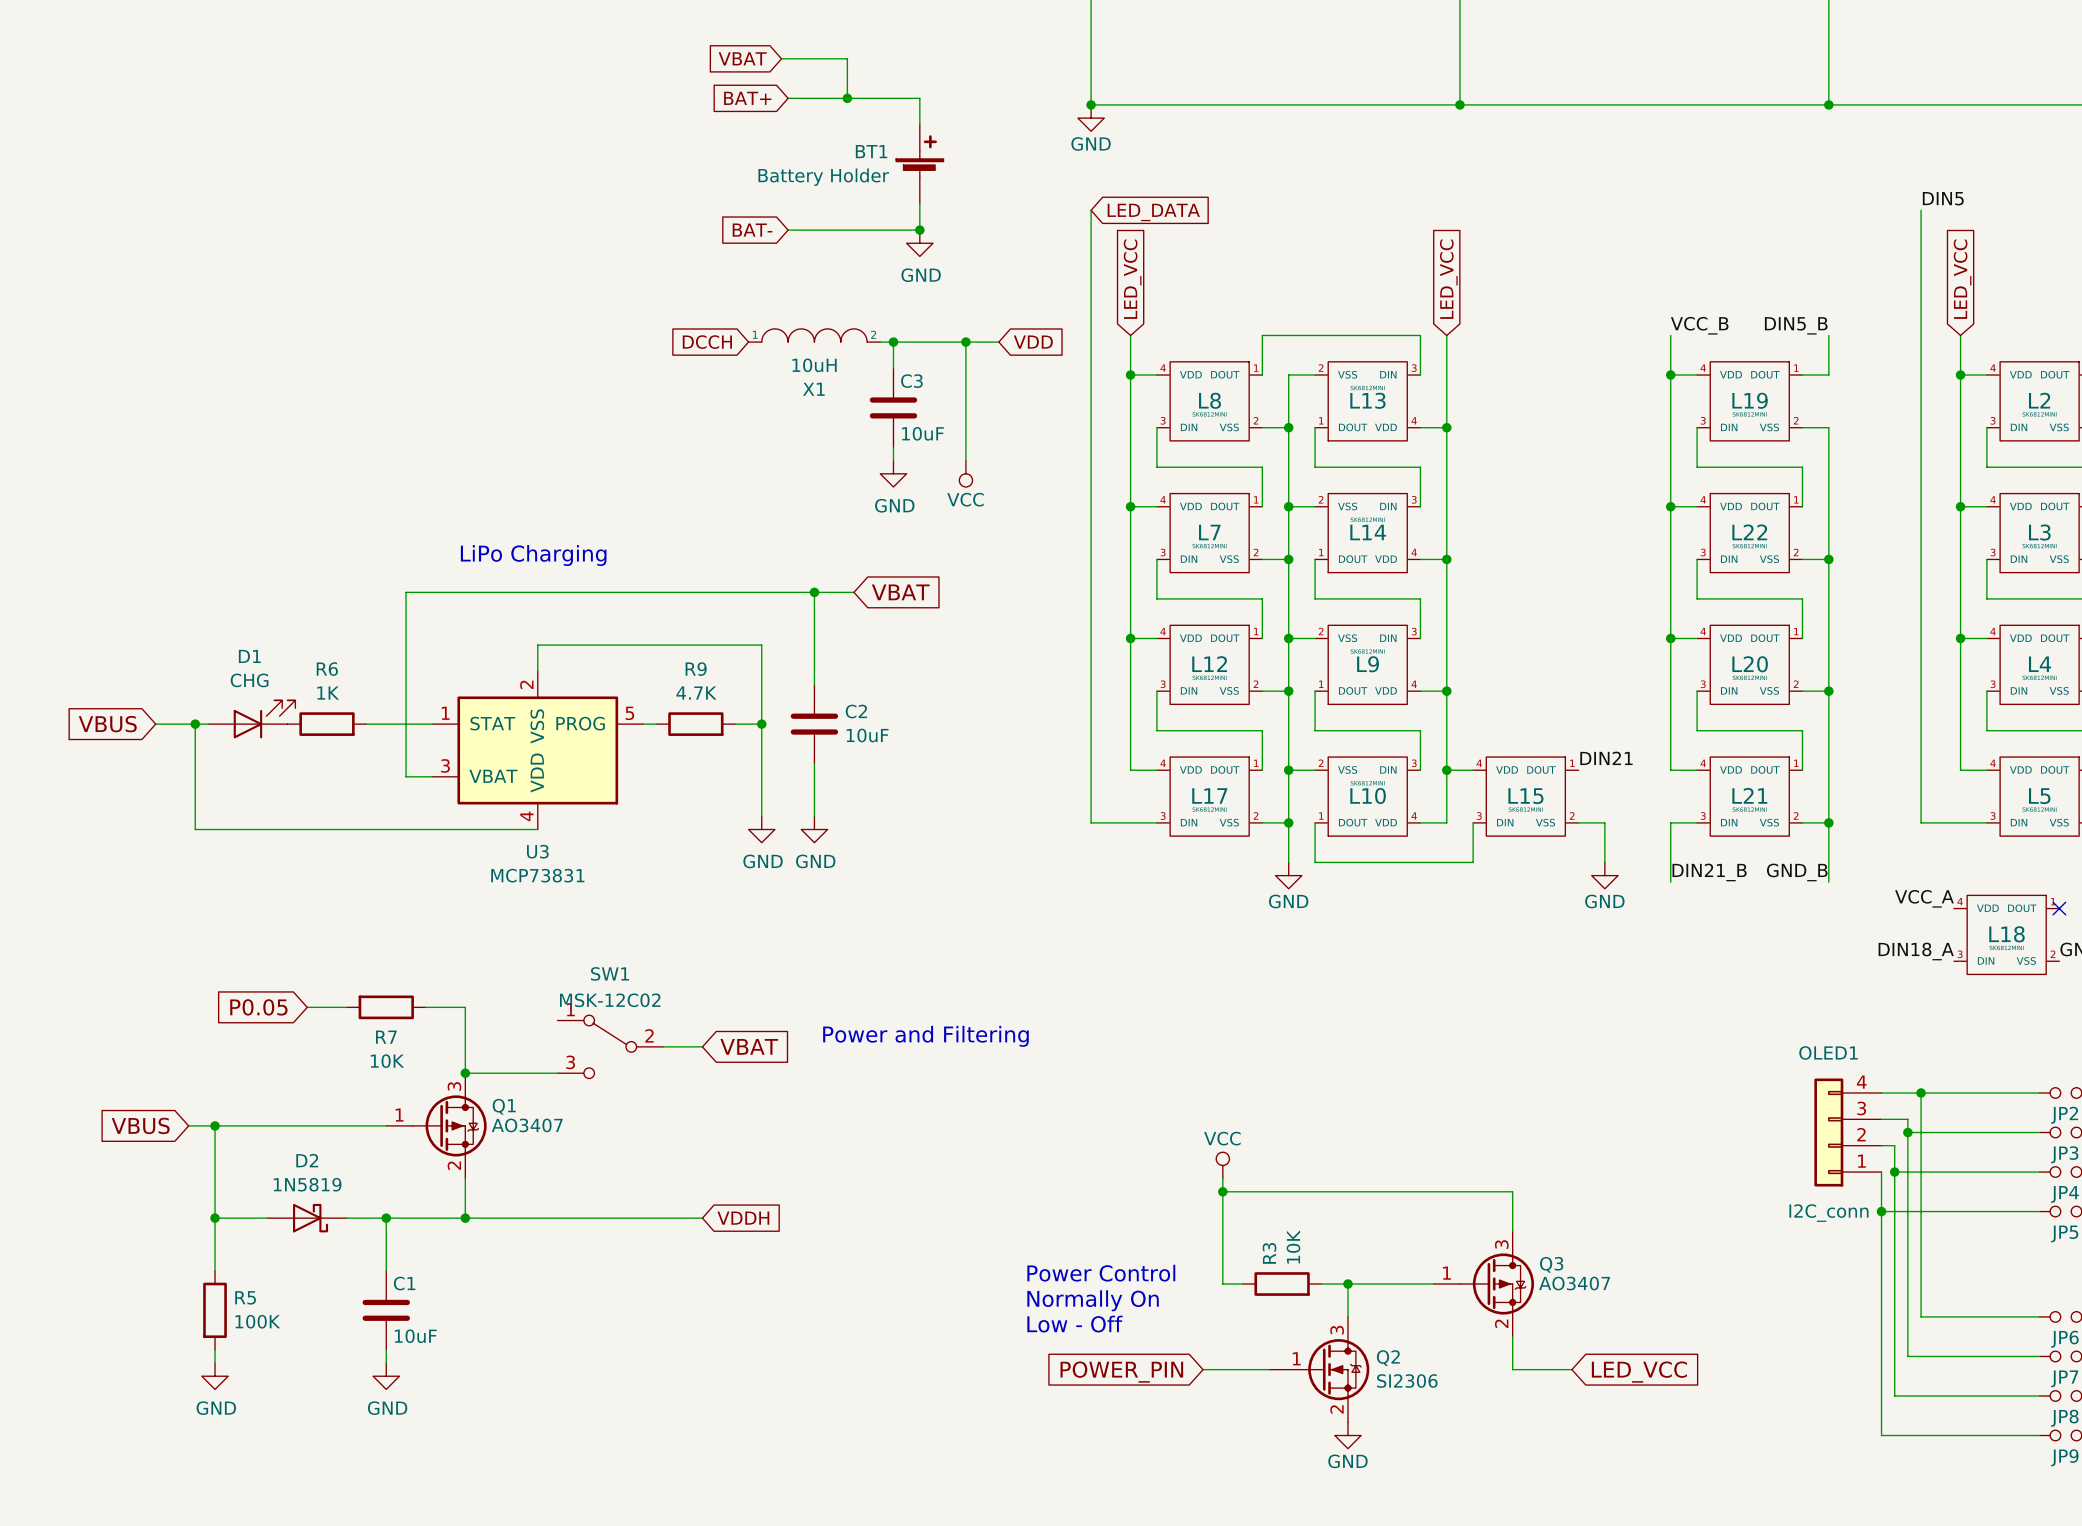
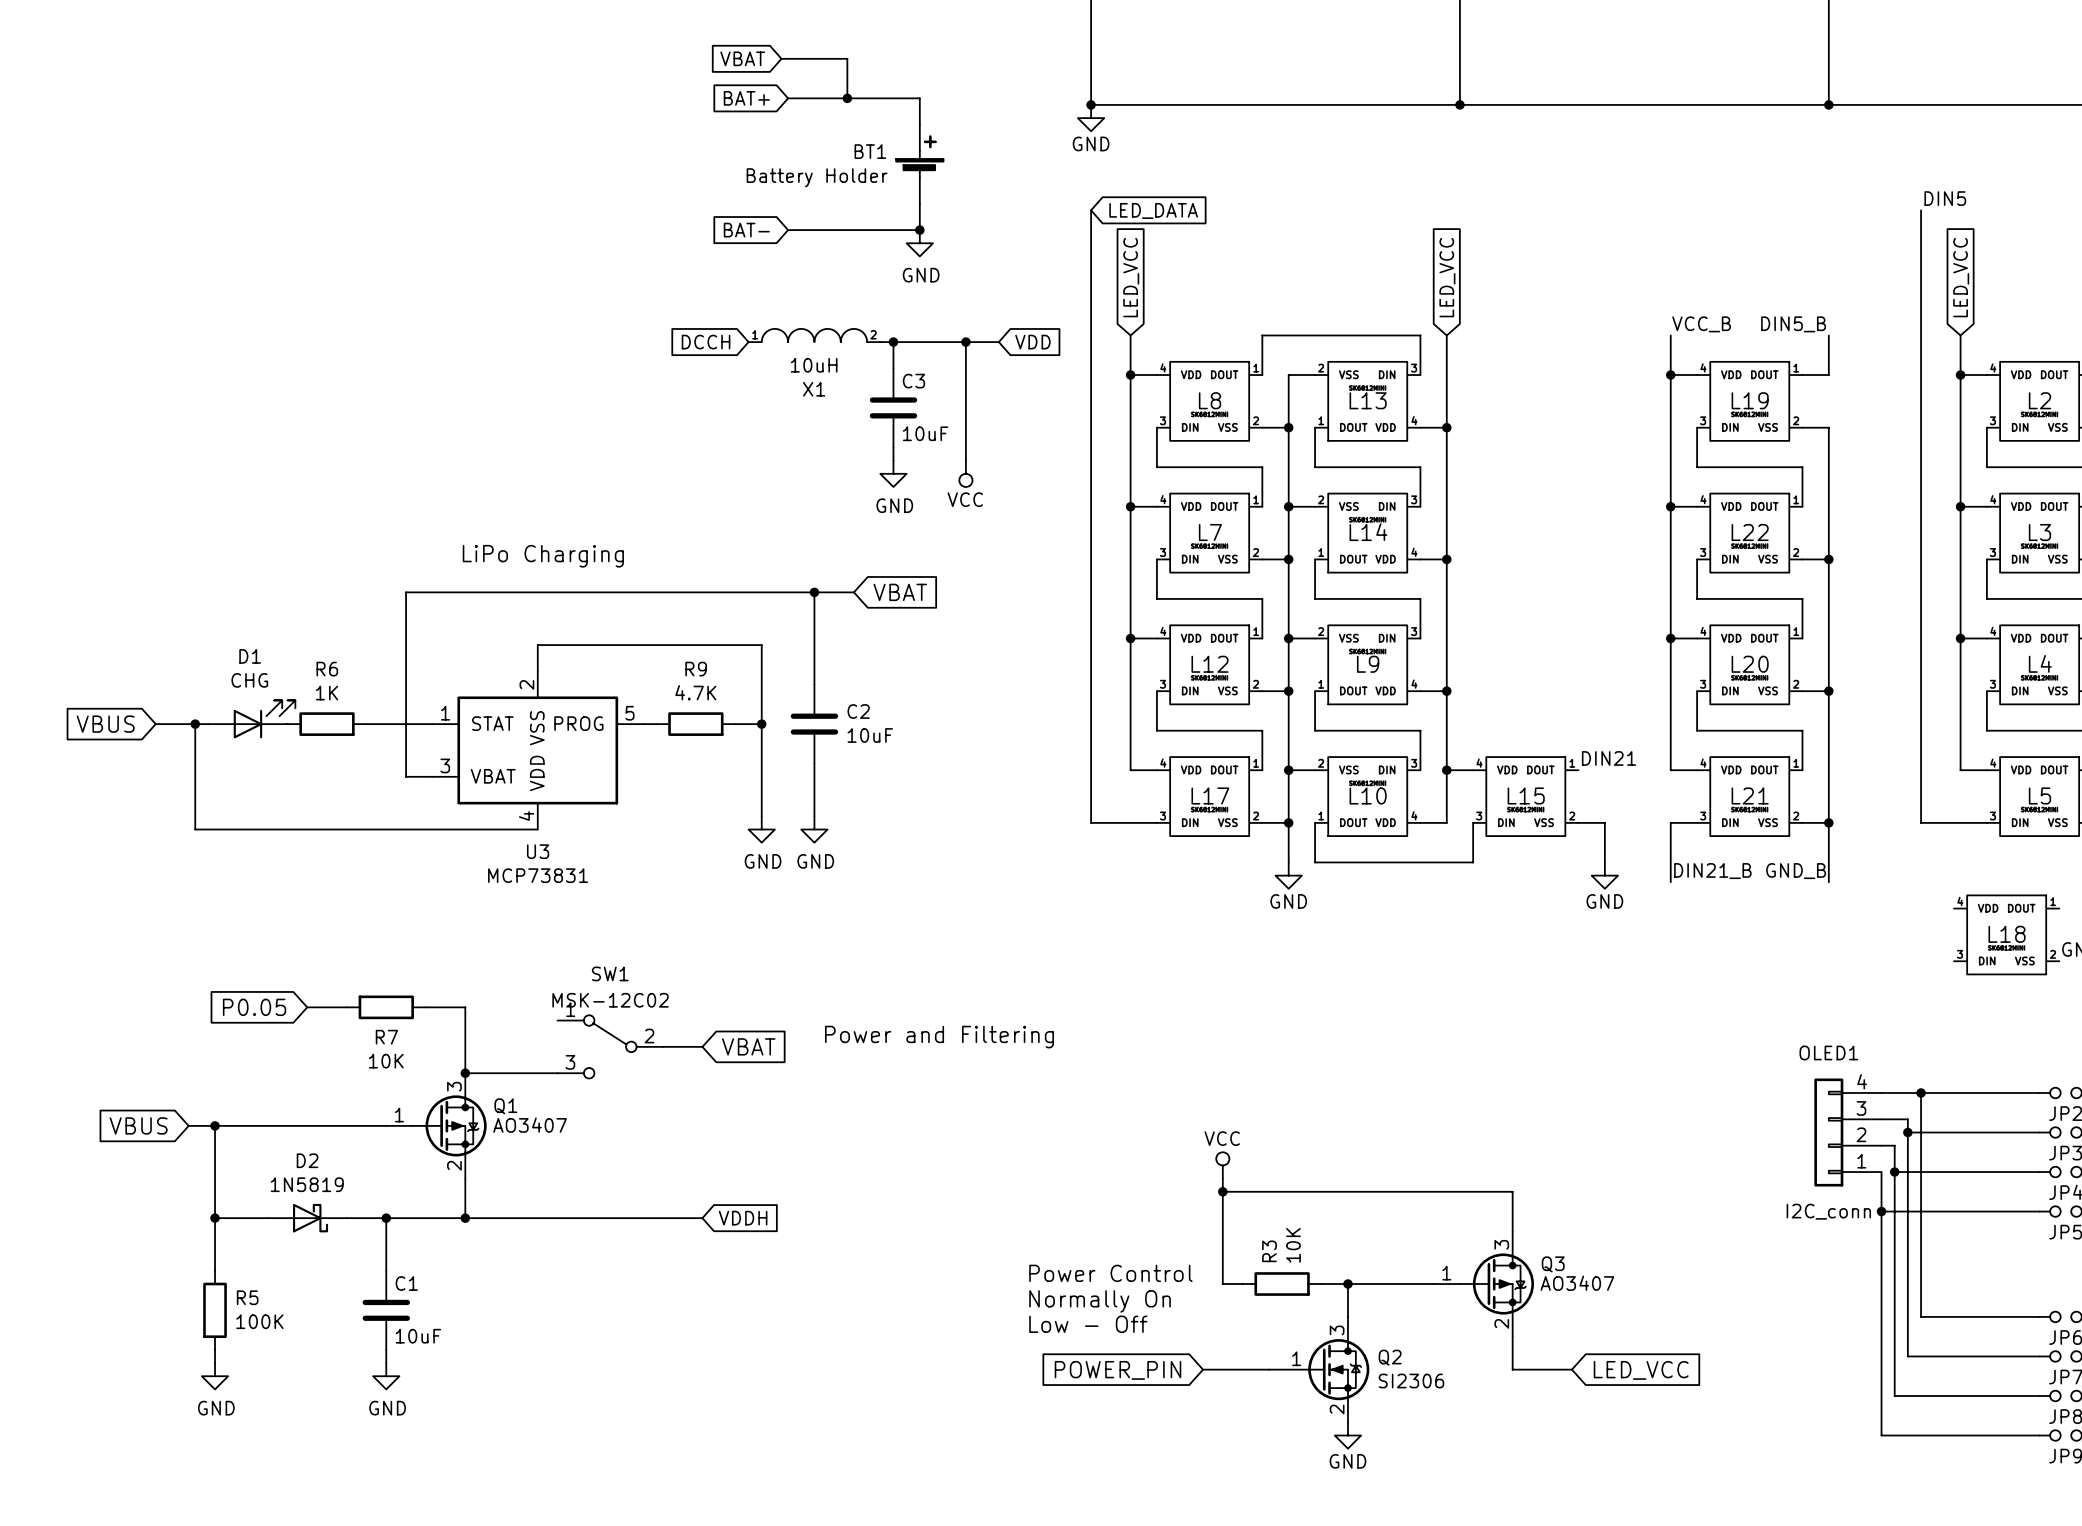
label: VCC_A (1924, 898) -> none
no-connect mark: (2059, 908) -> none
label: DIN18_A (1916, 951) -> none

